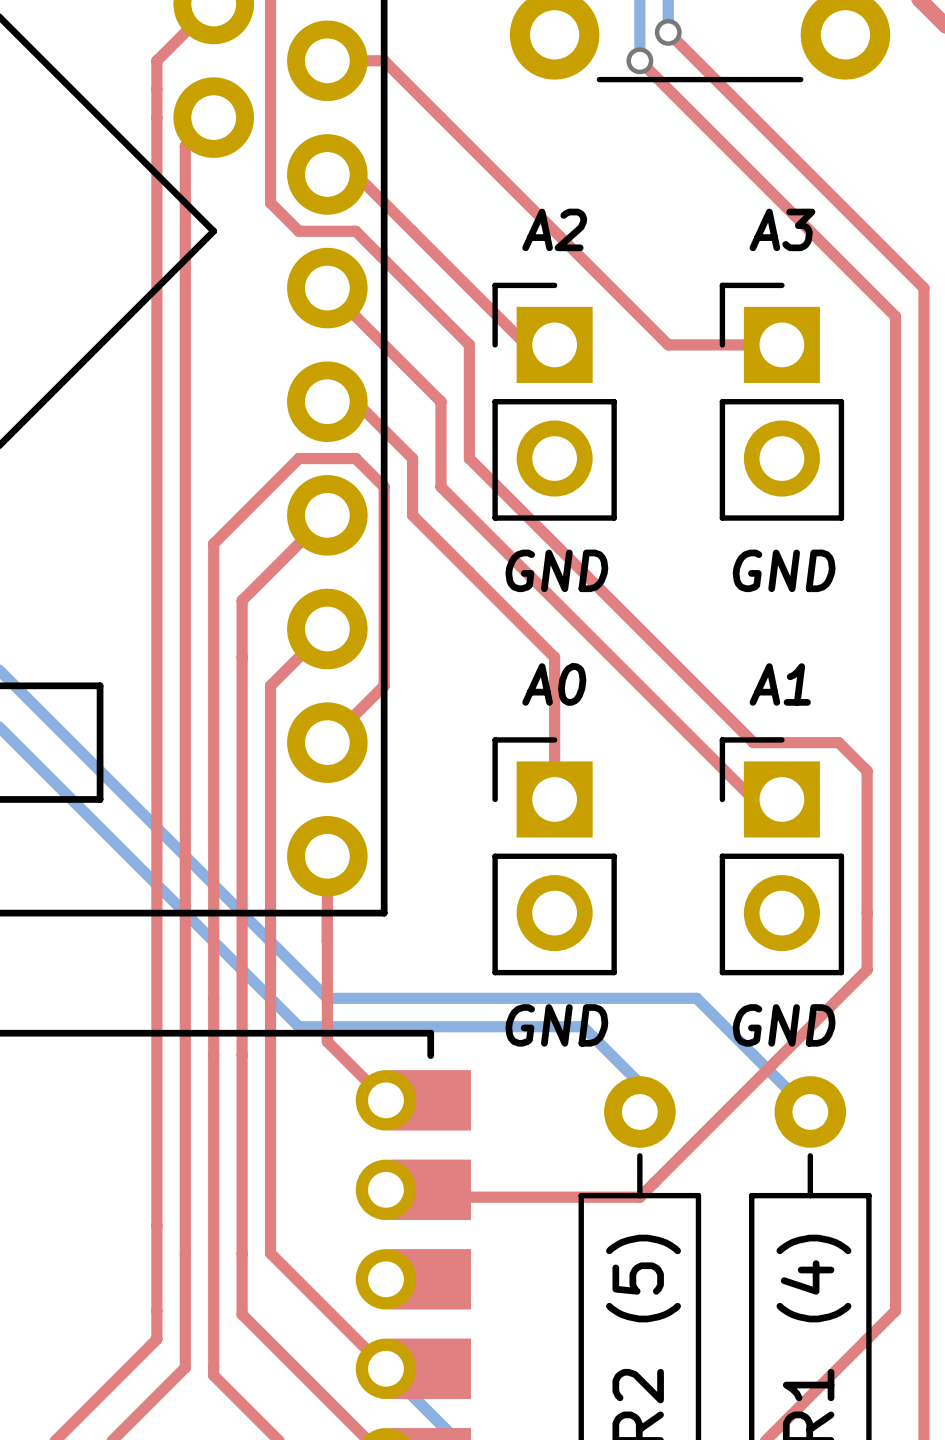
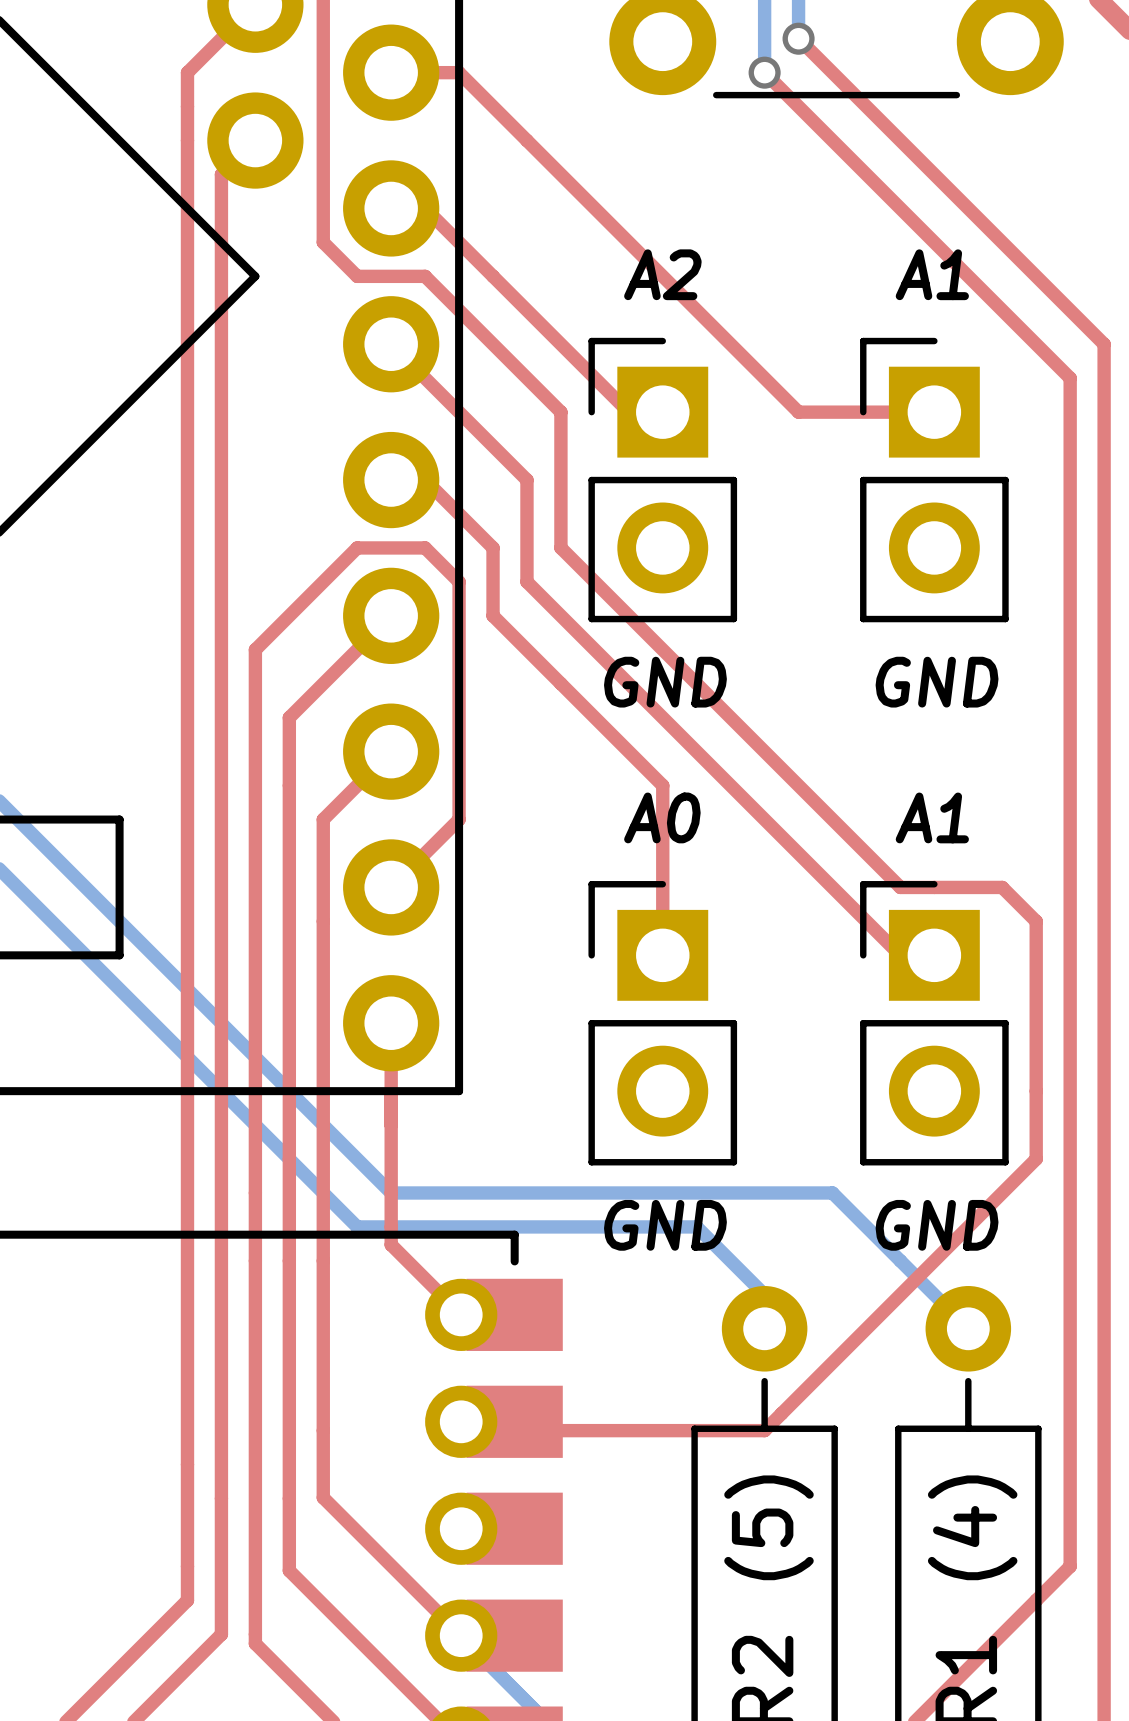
text: A3 (782, 229) -> A1 (932, 274)

